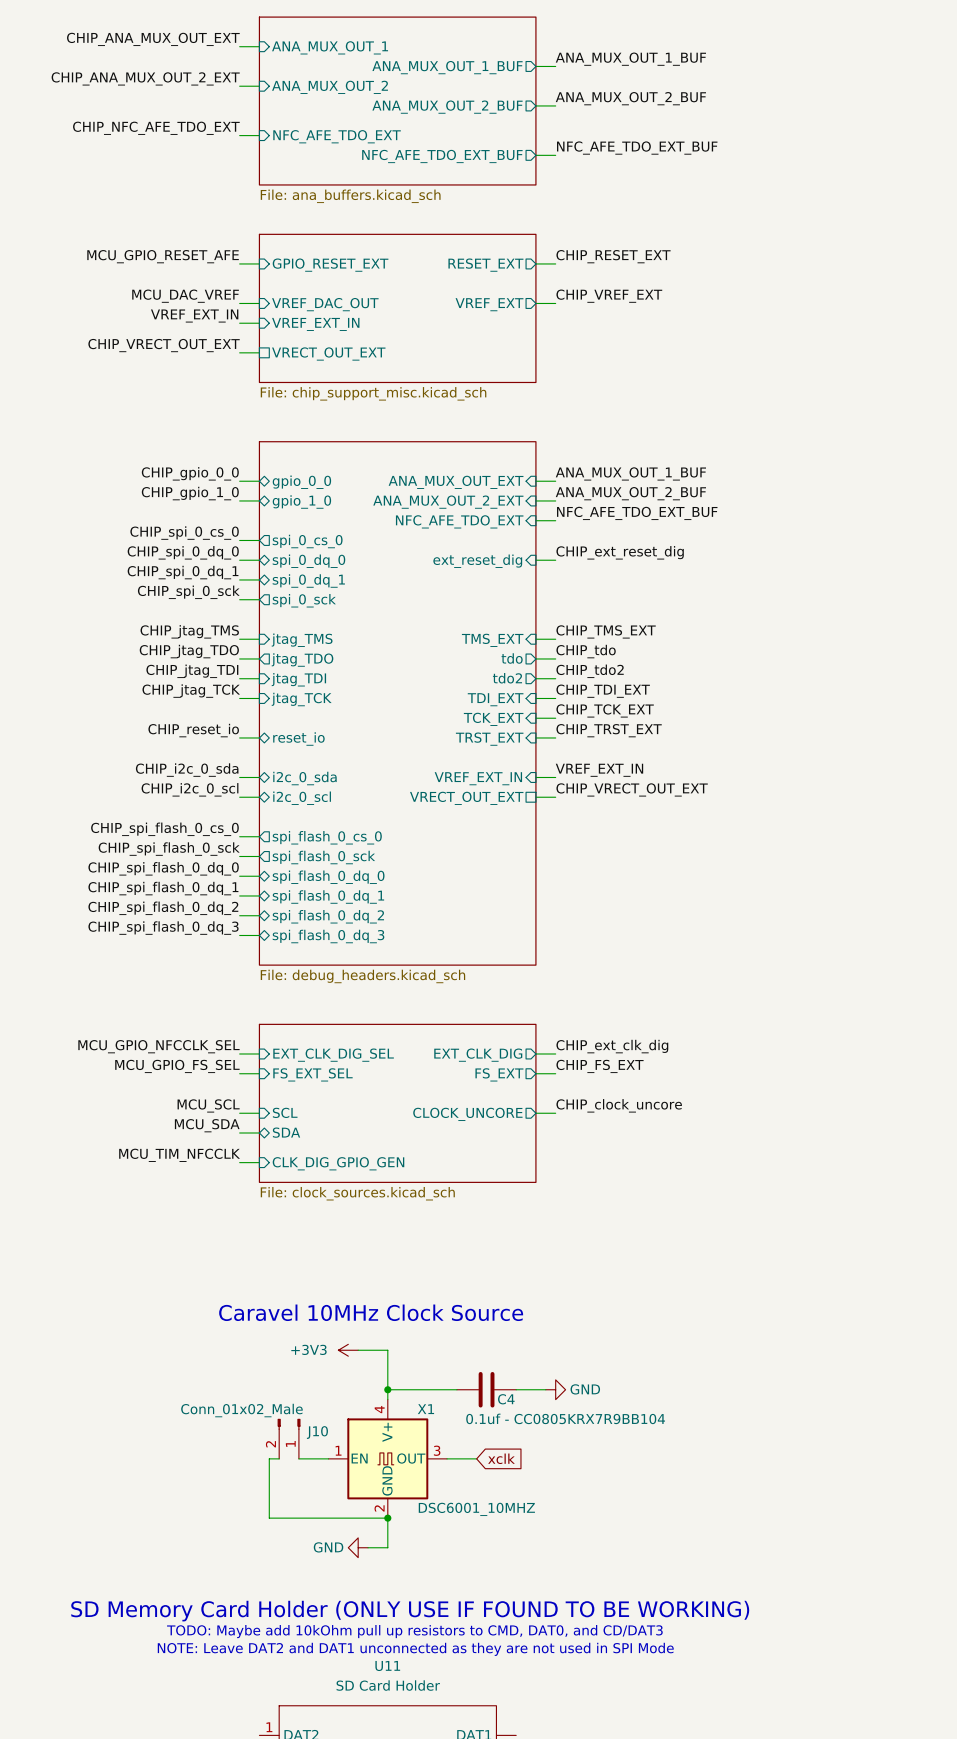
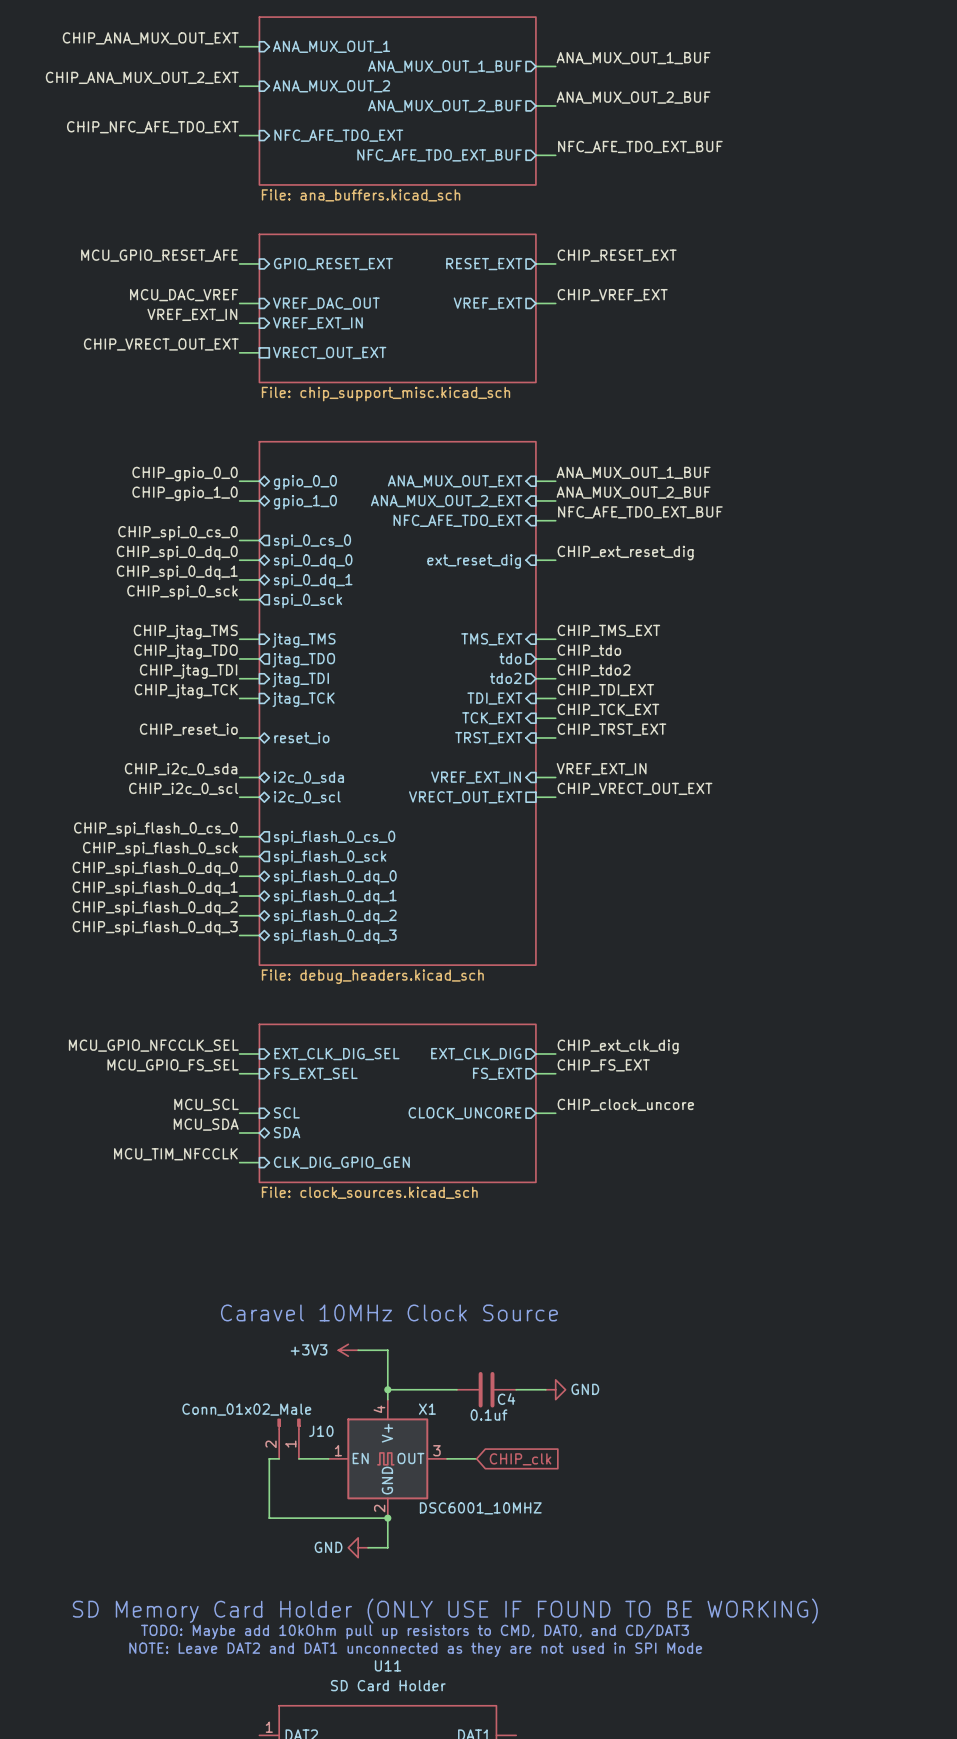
C4 value: 0.1uf - CC0805KRX7R9BB104 (565, 1418) -> 0.1uf (489, 1415)
global label: xclk (501, 1458) -> CHIP_clk (520, 1459)

